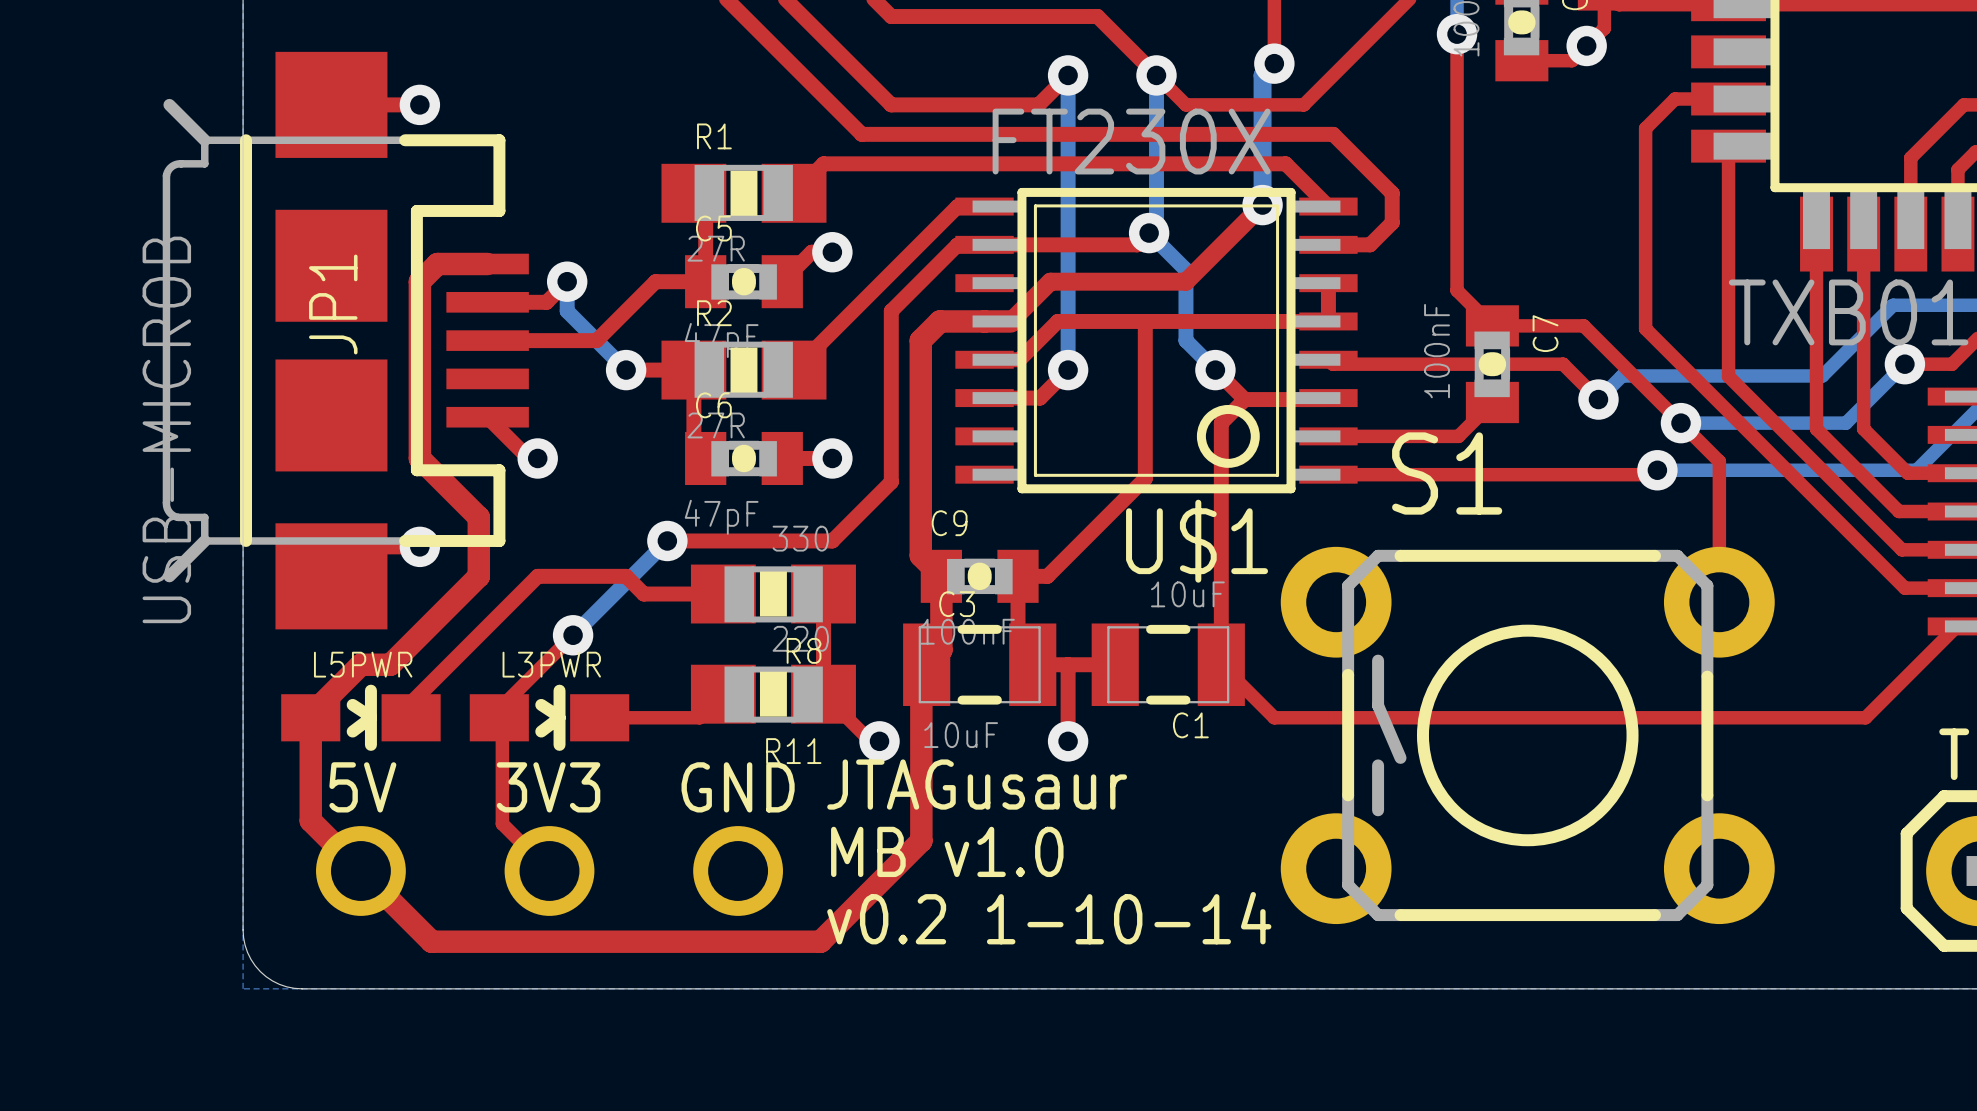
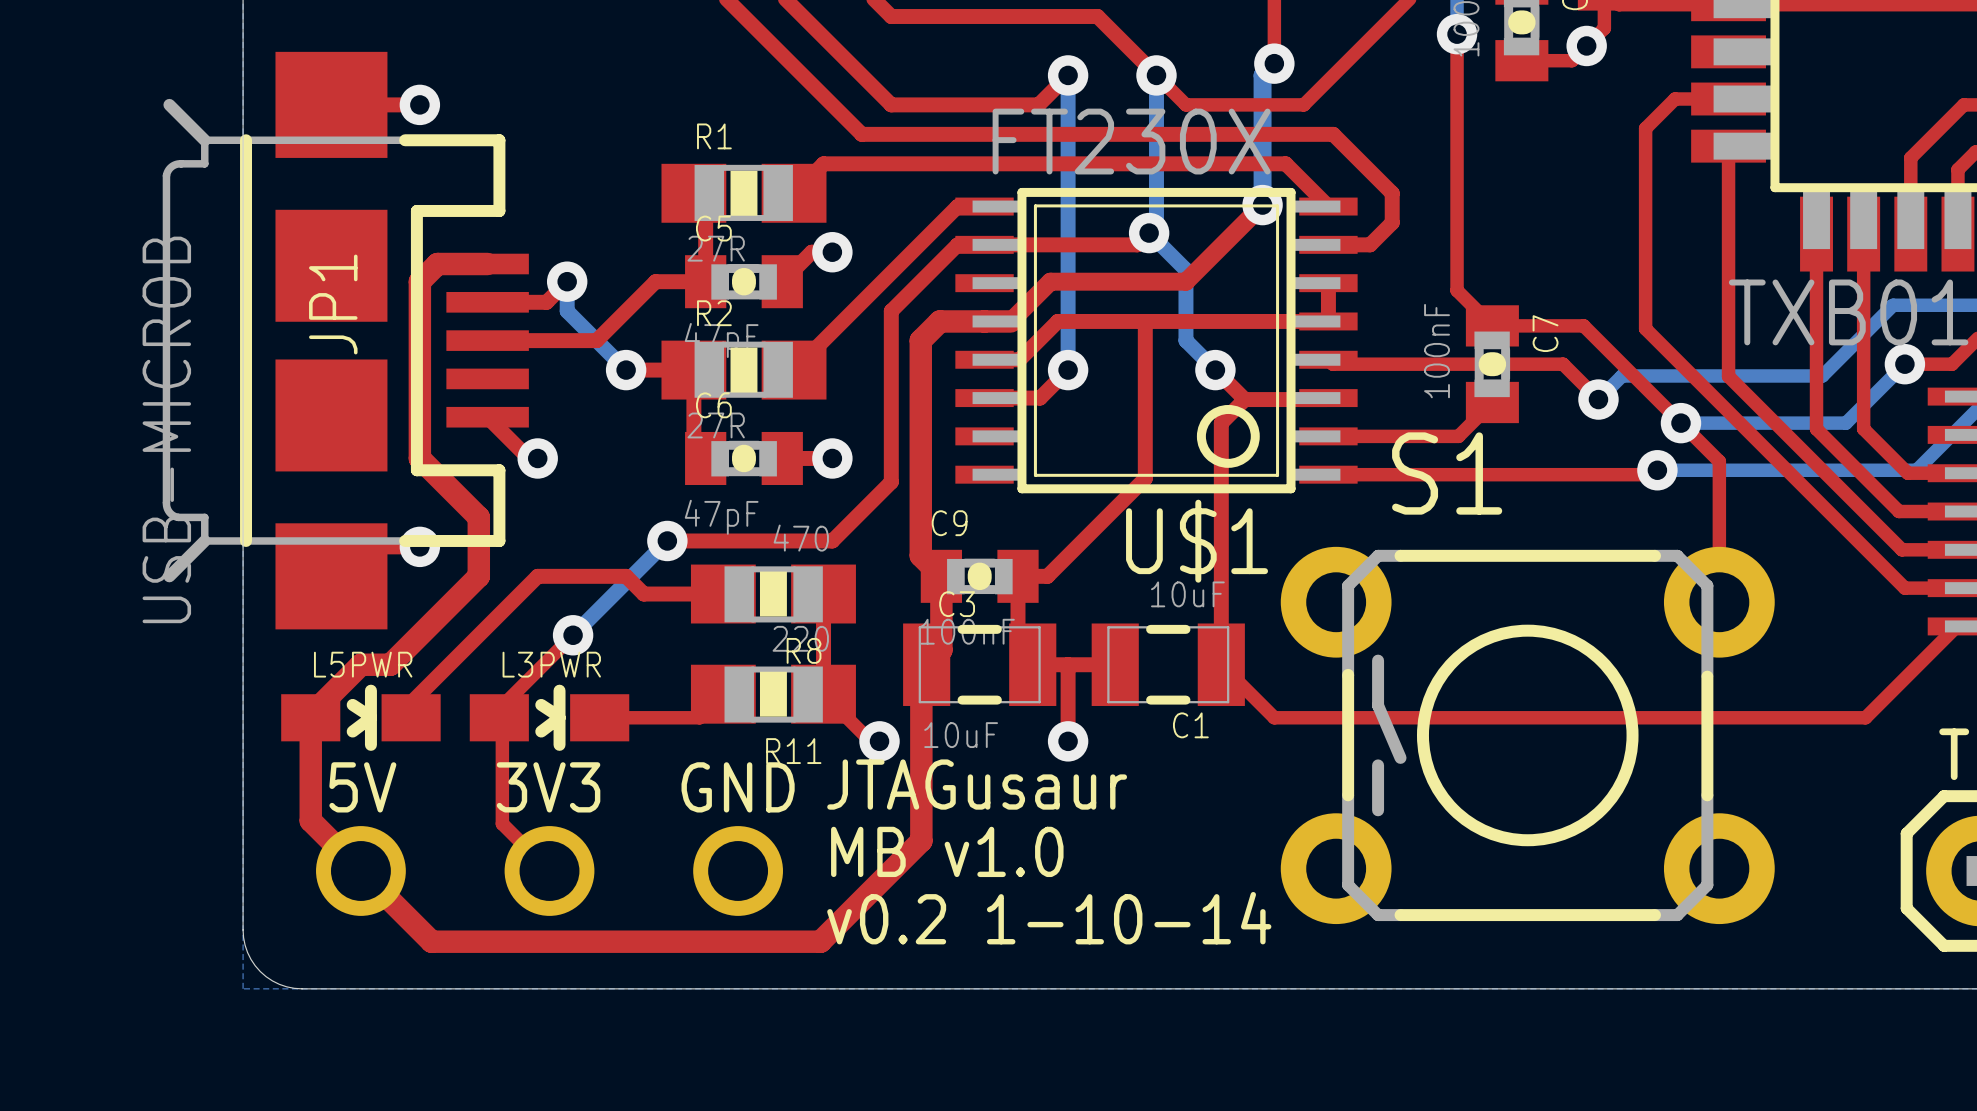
R8 value: 330 (800, 538) -> 470 (801, 538)

